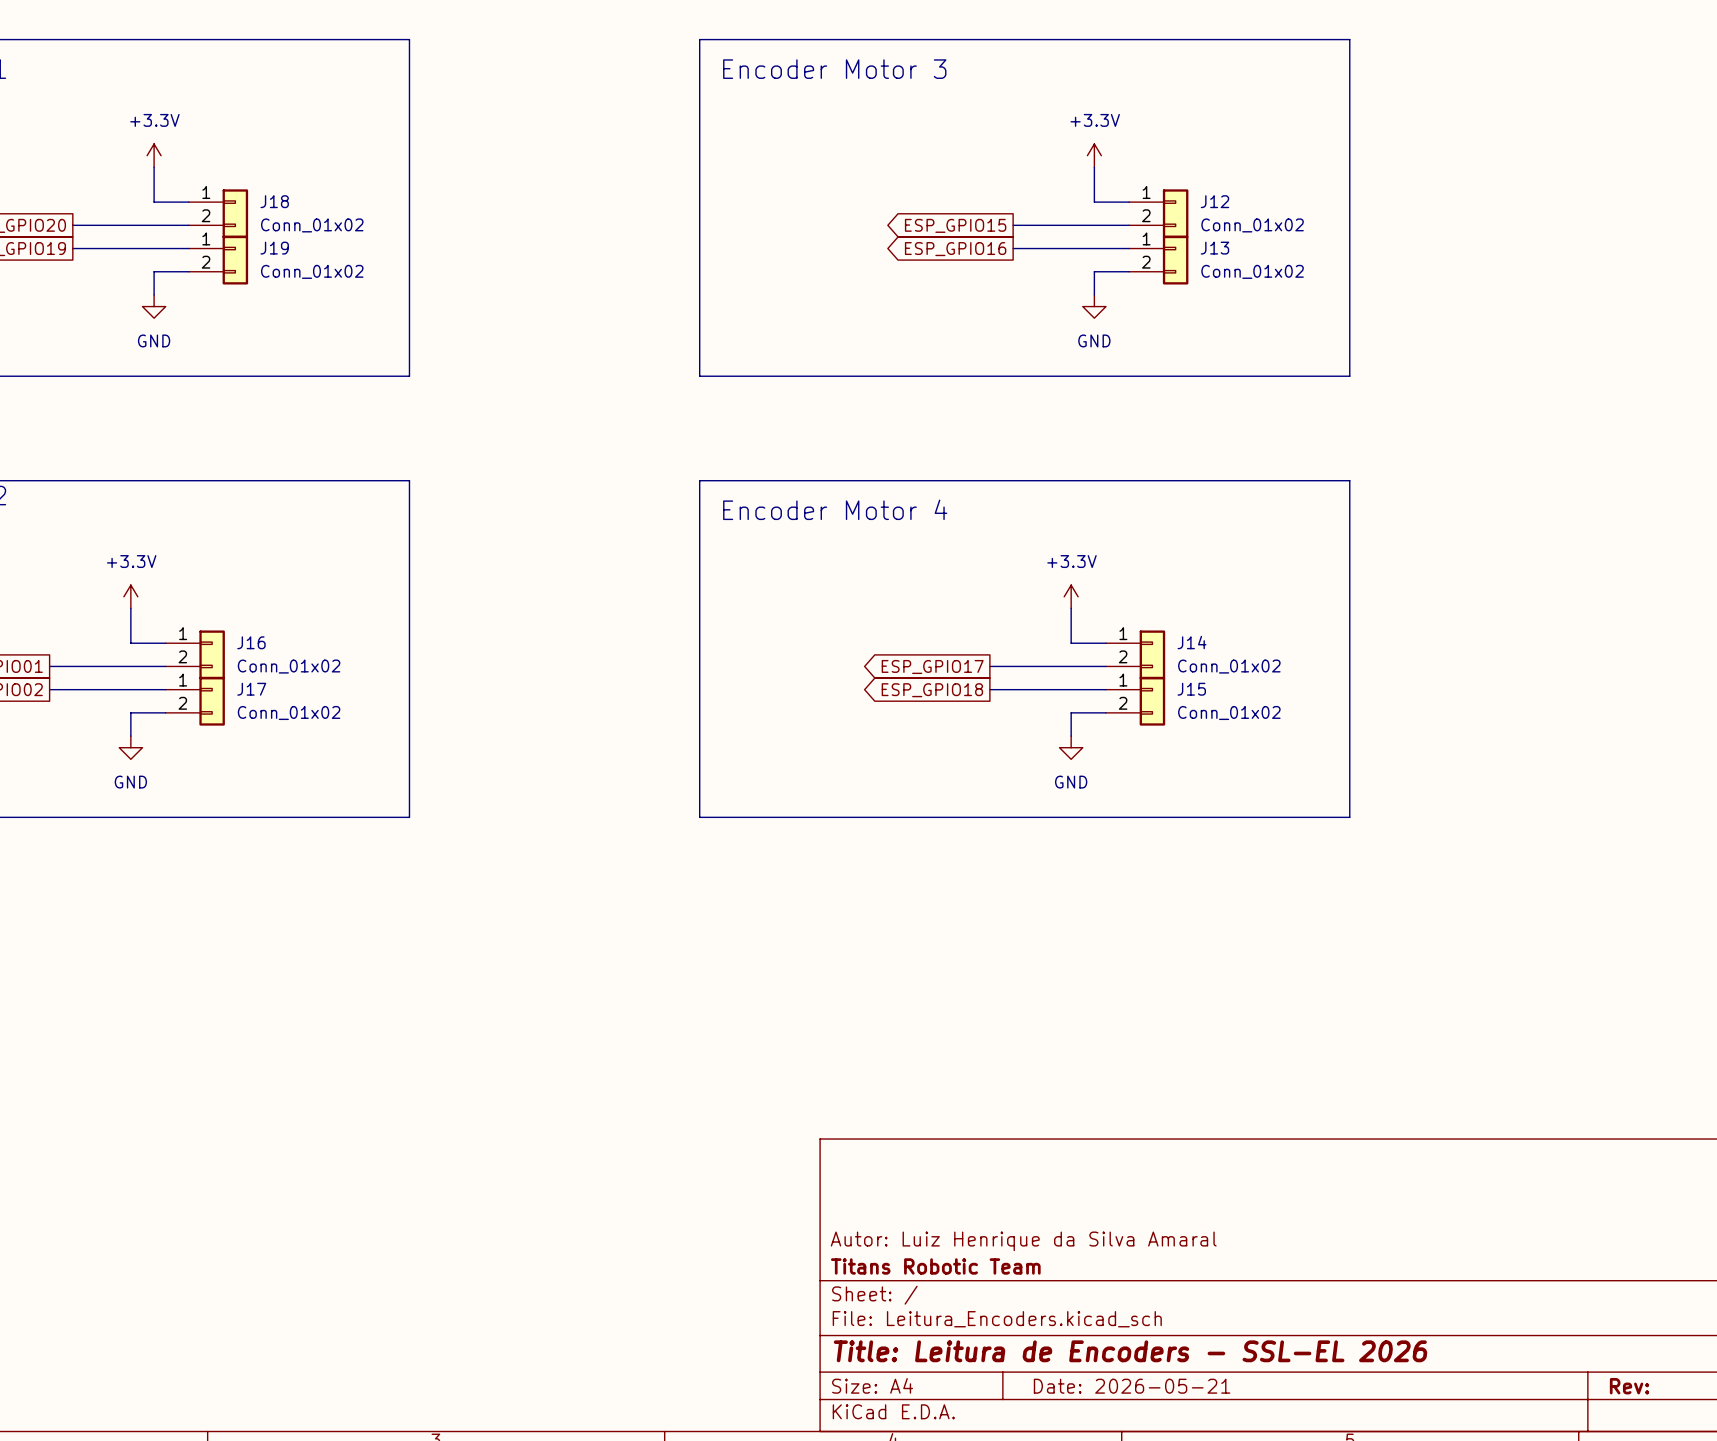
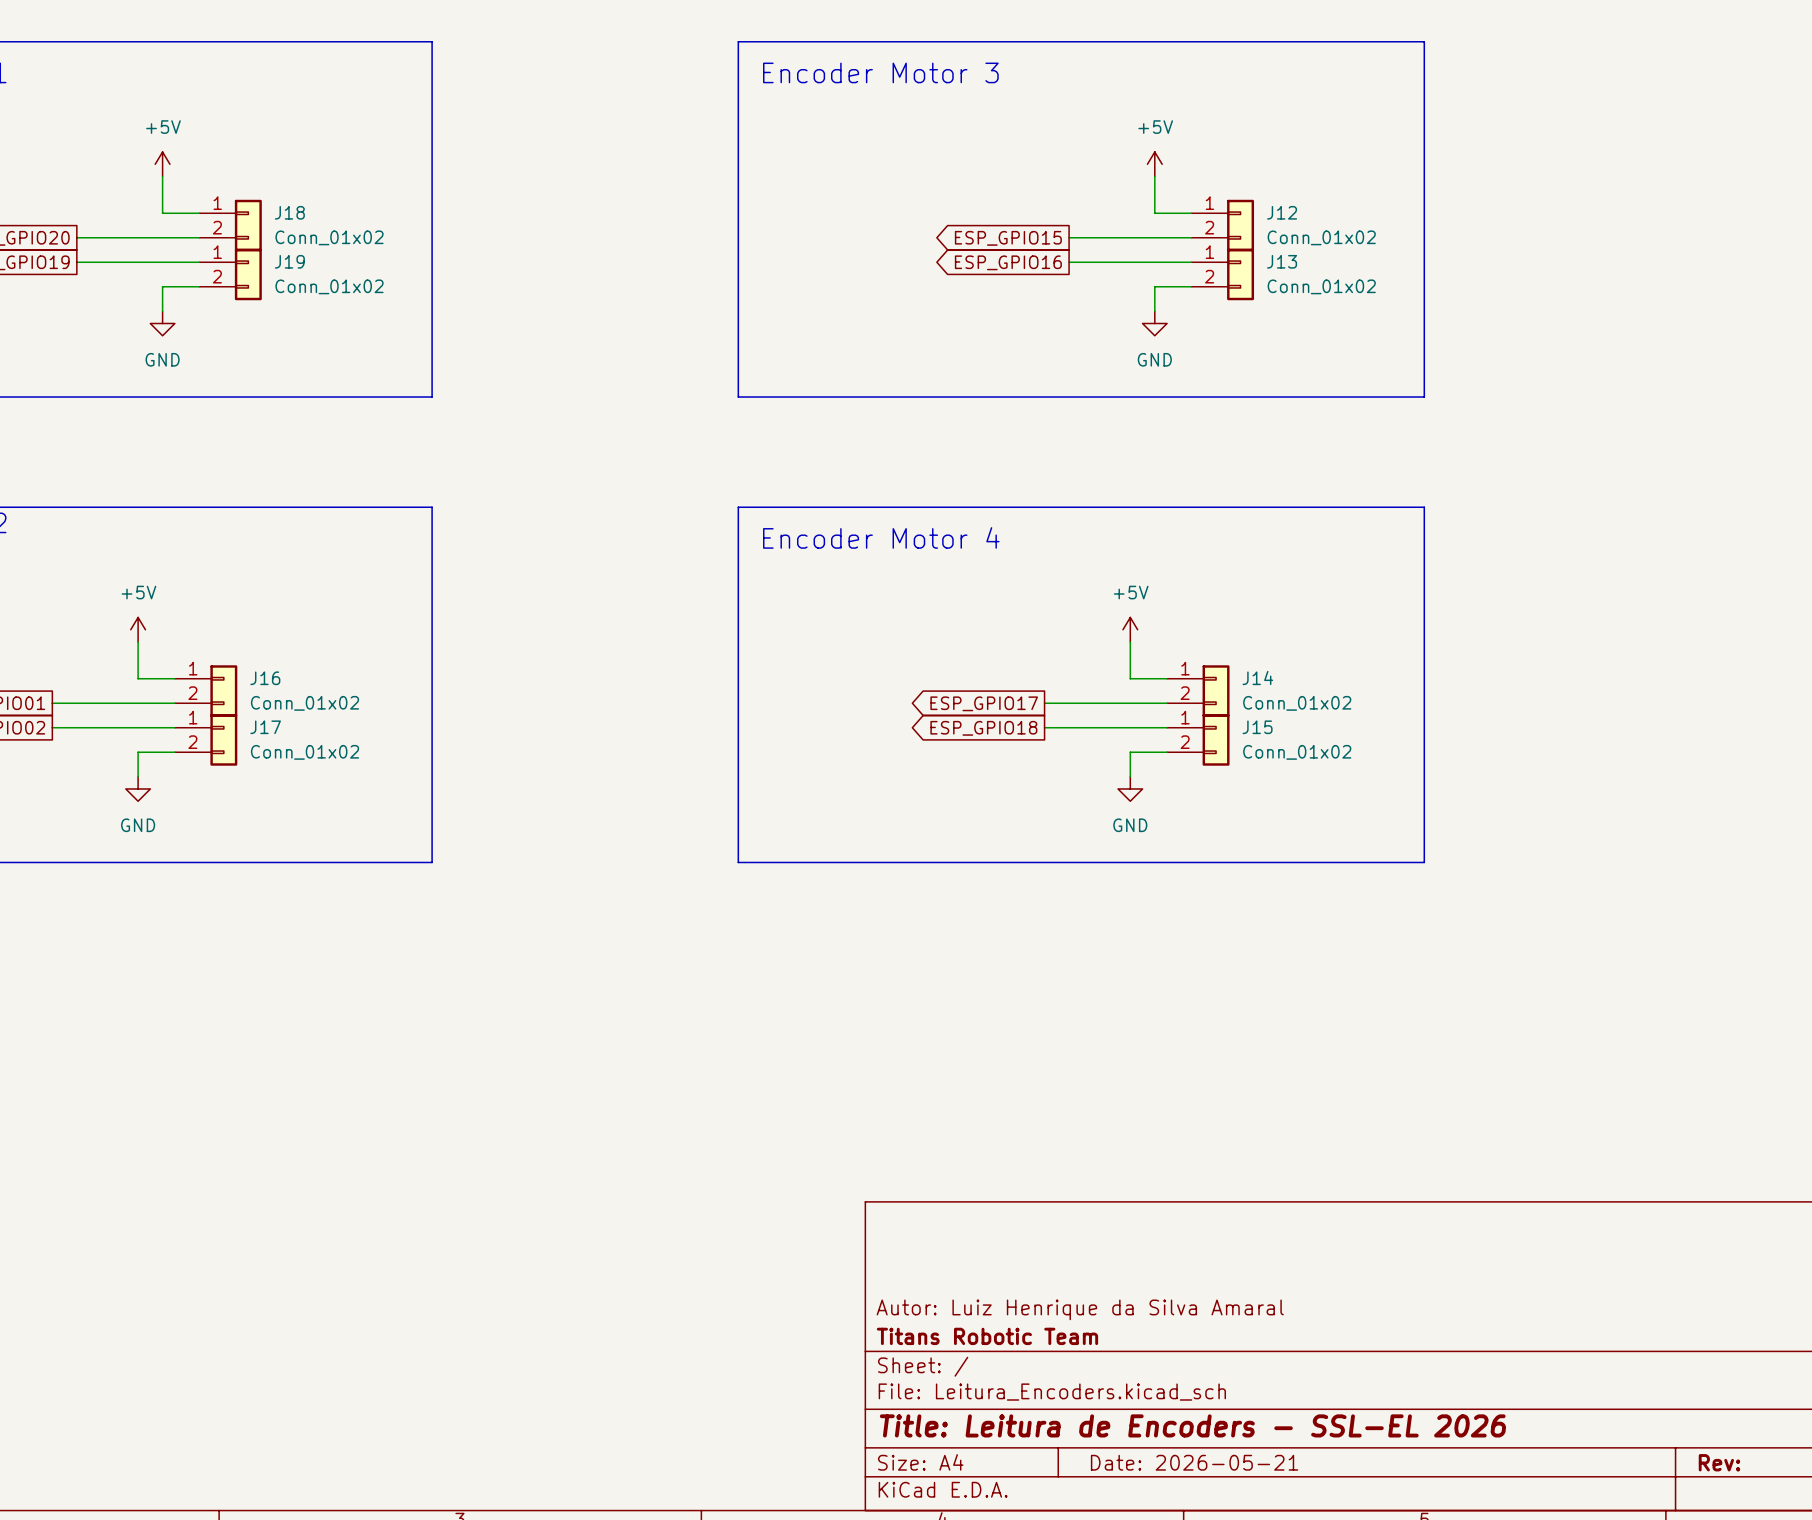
power symbol: +3.3V (154, 155) -> +5V (162, 164)
power symbol: +3.3V (1094, 155) -> +5V (1154, 164)
power symbol: +3.3V (130, 596) -> +5V (138, 629)
power symbol: +3.3V (1071, 596) -> +5V (1130, 629)

